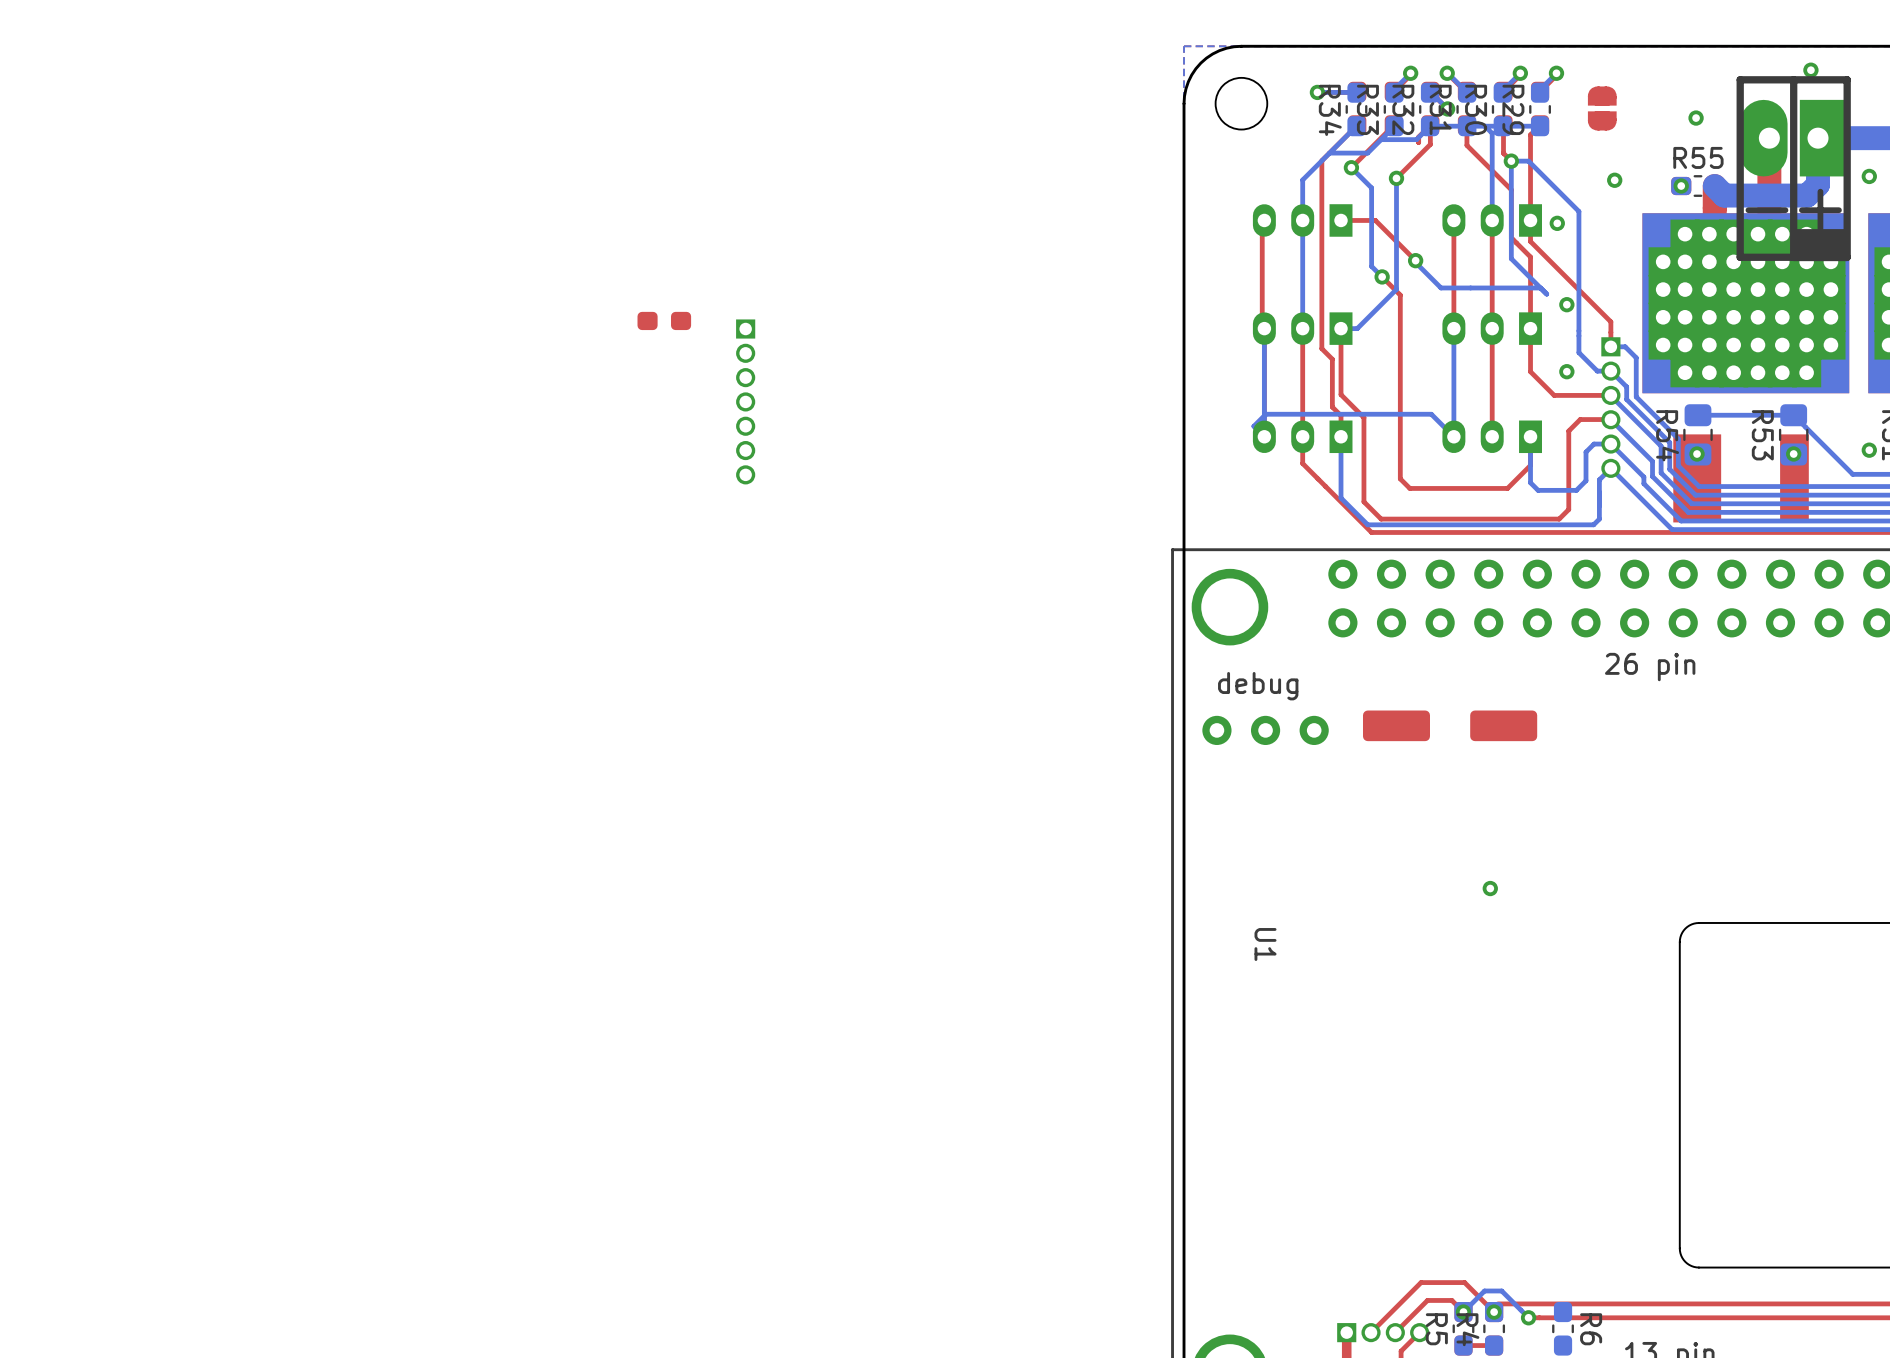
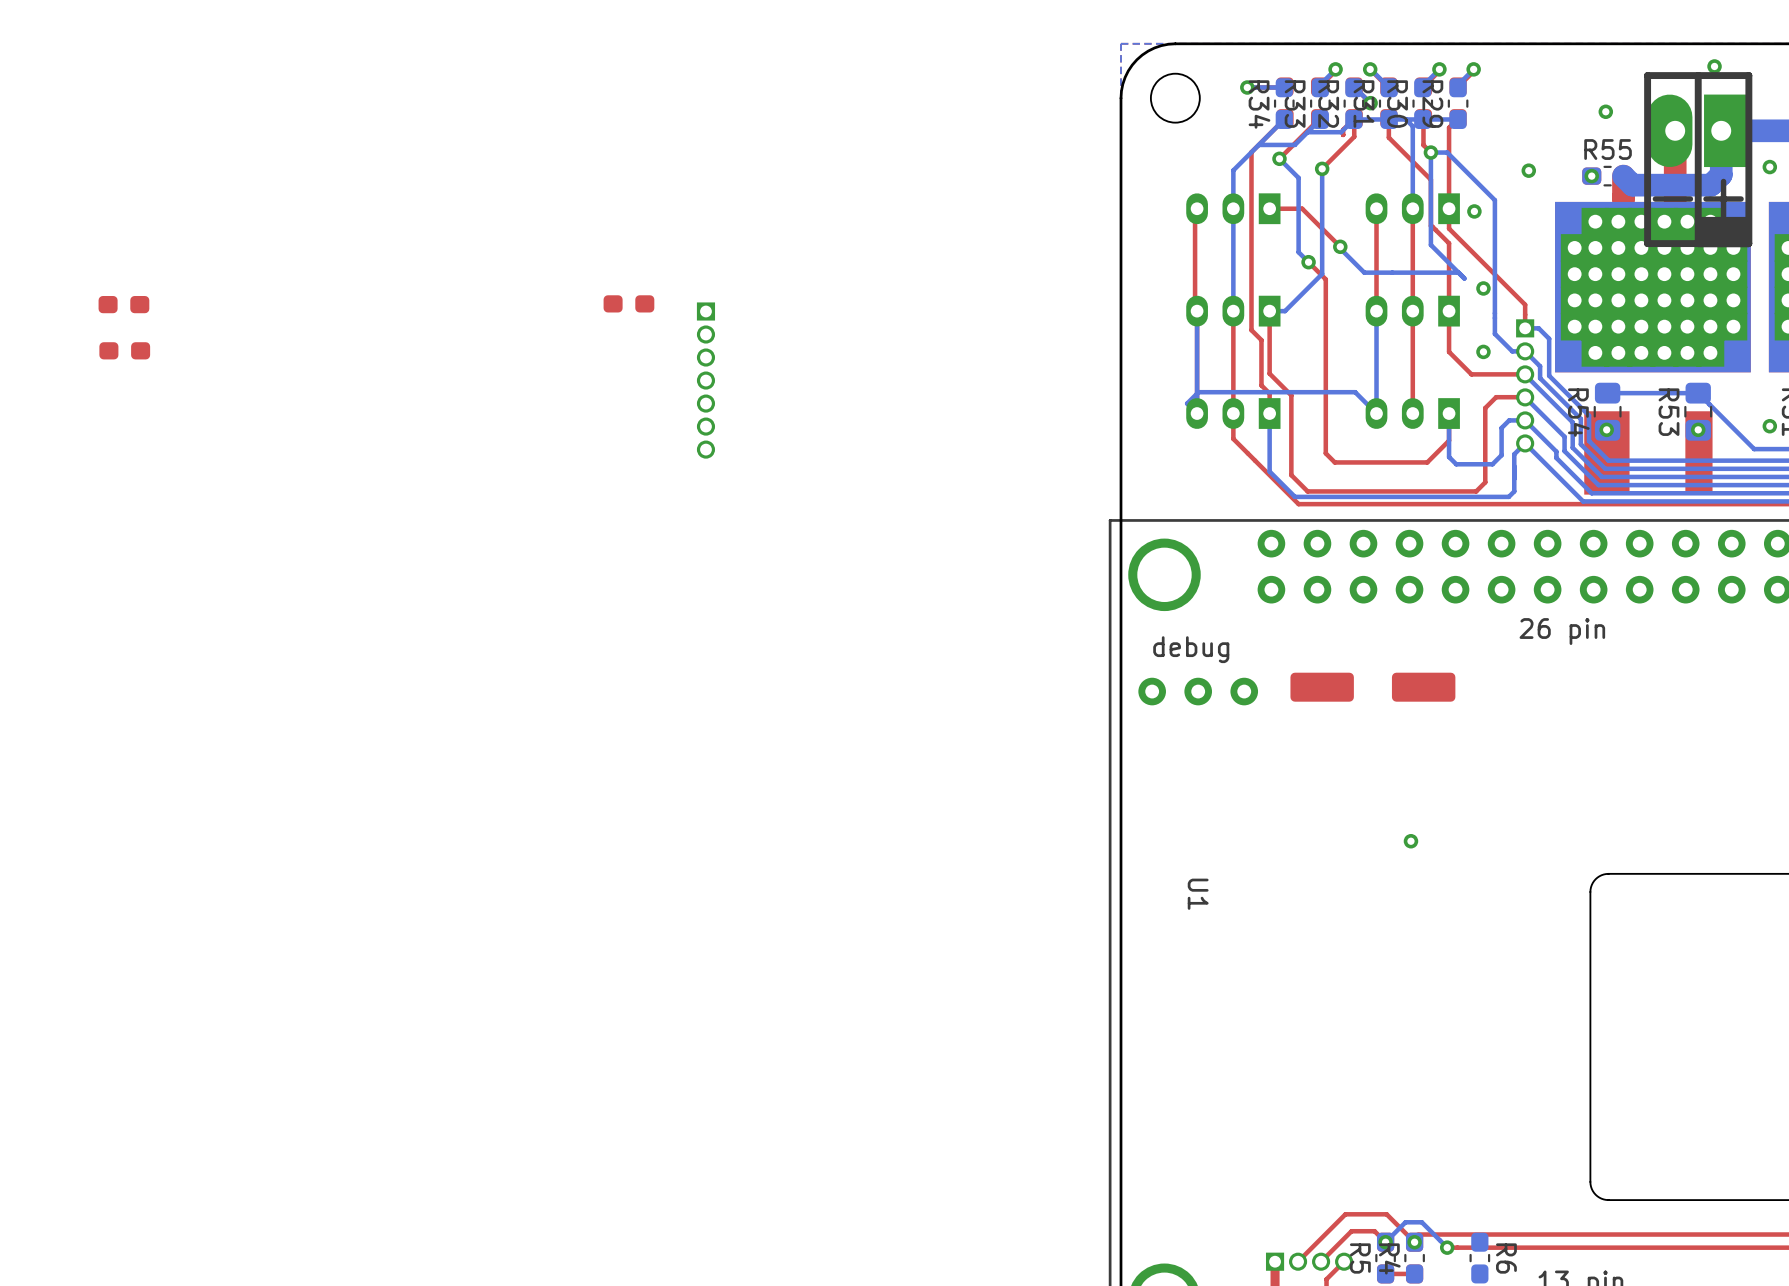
part: (1602, 108) -> none
part: none -> (123, 304)
part: none -> (124, 350)

